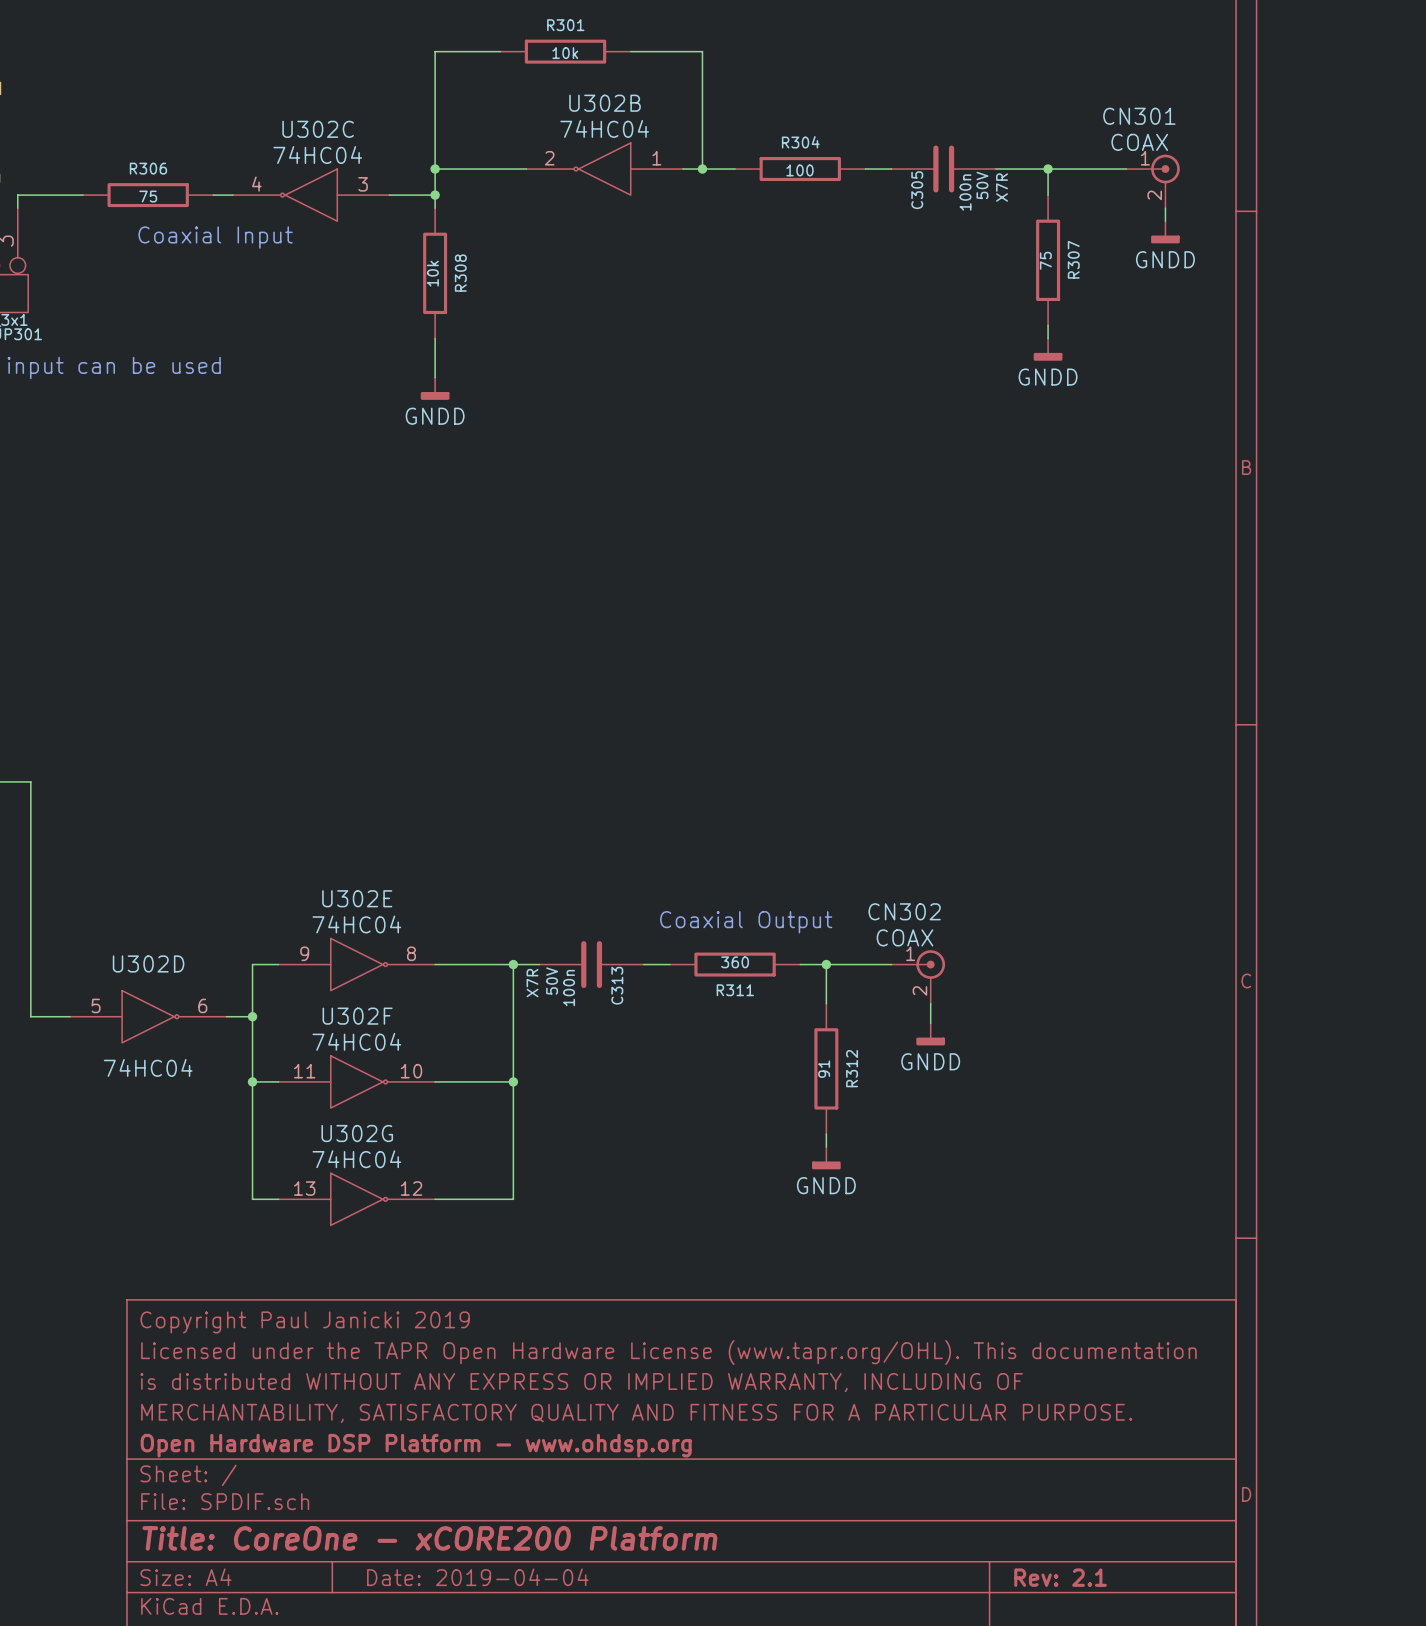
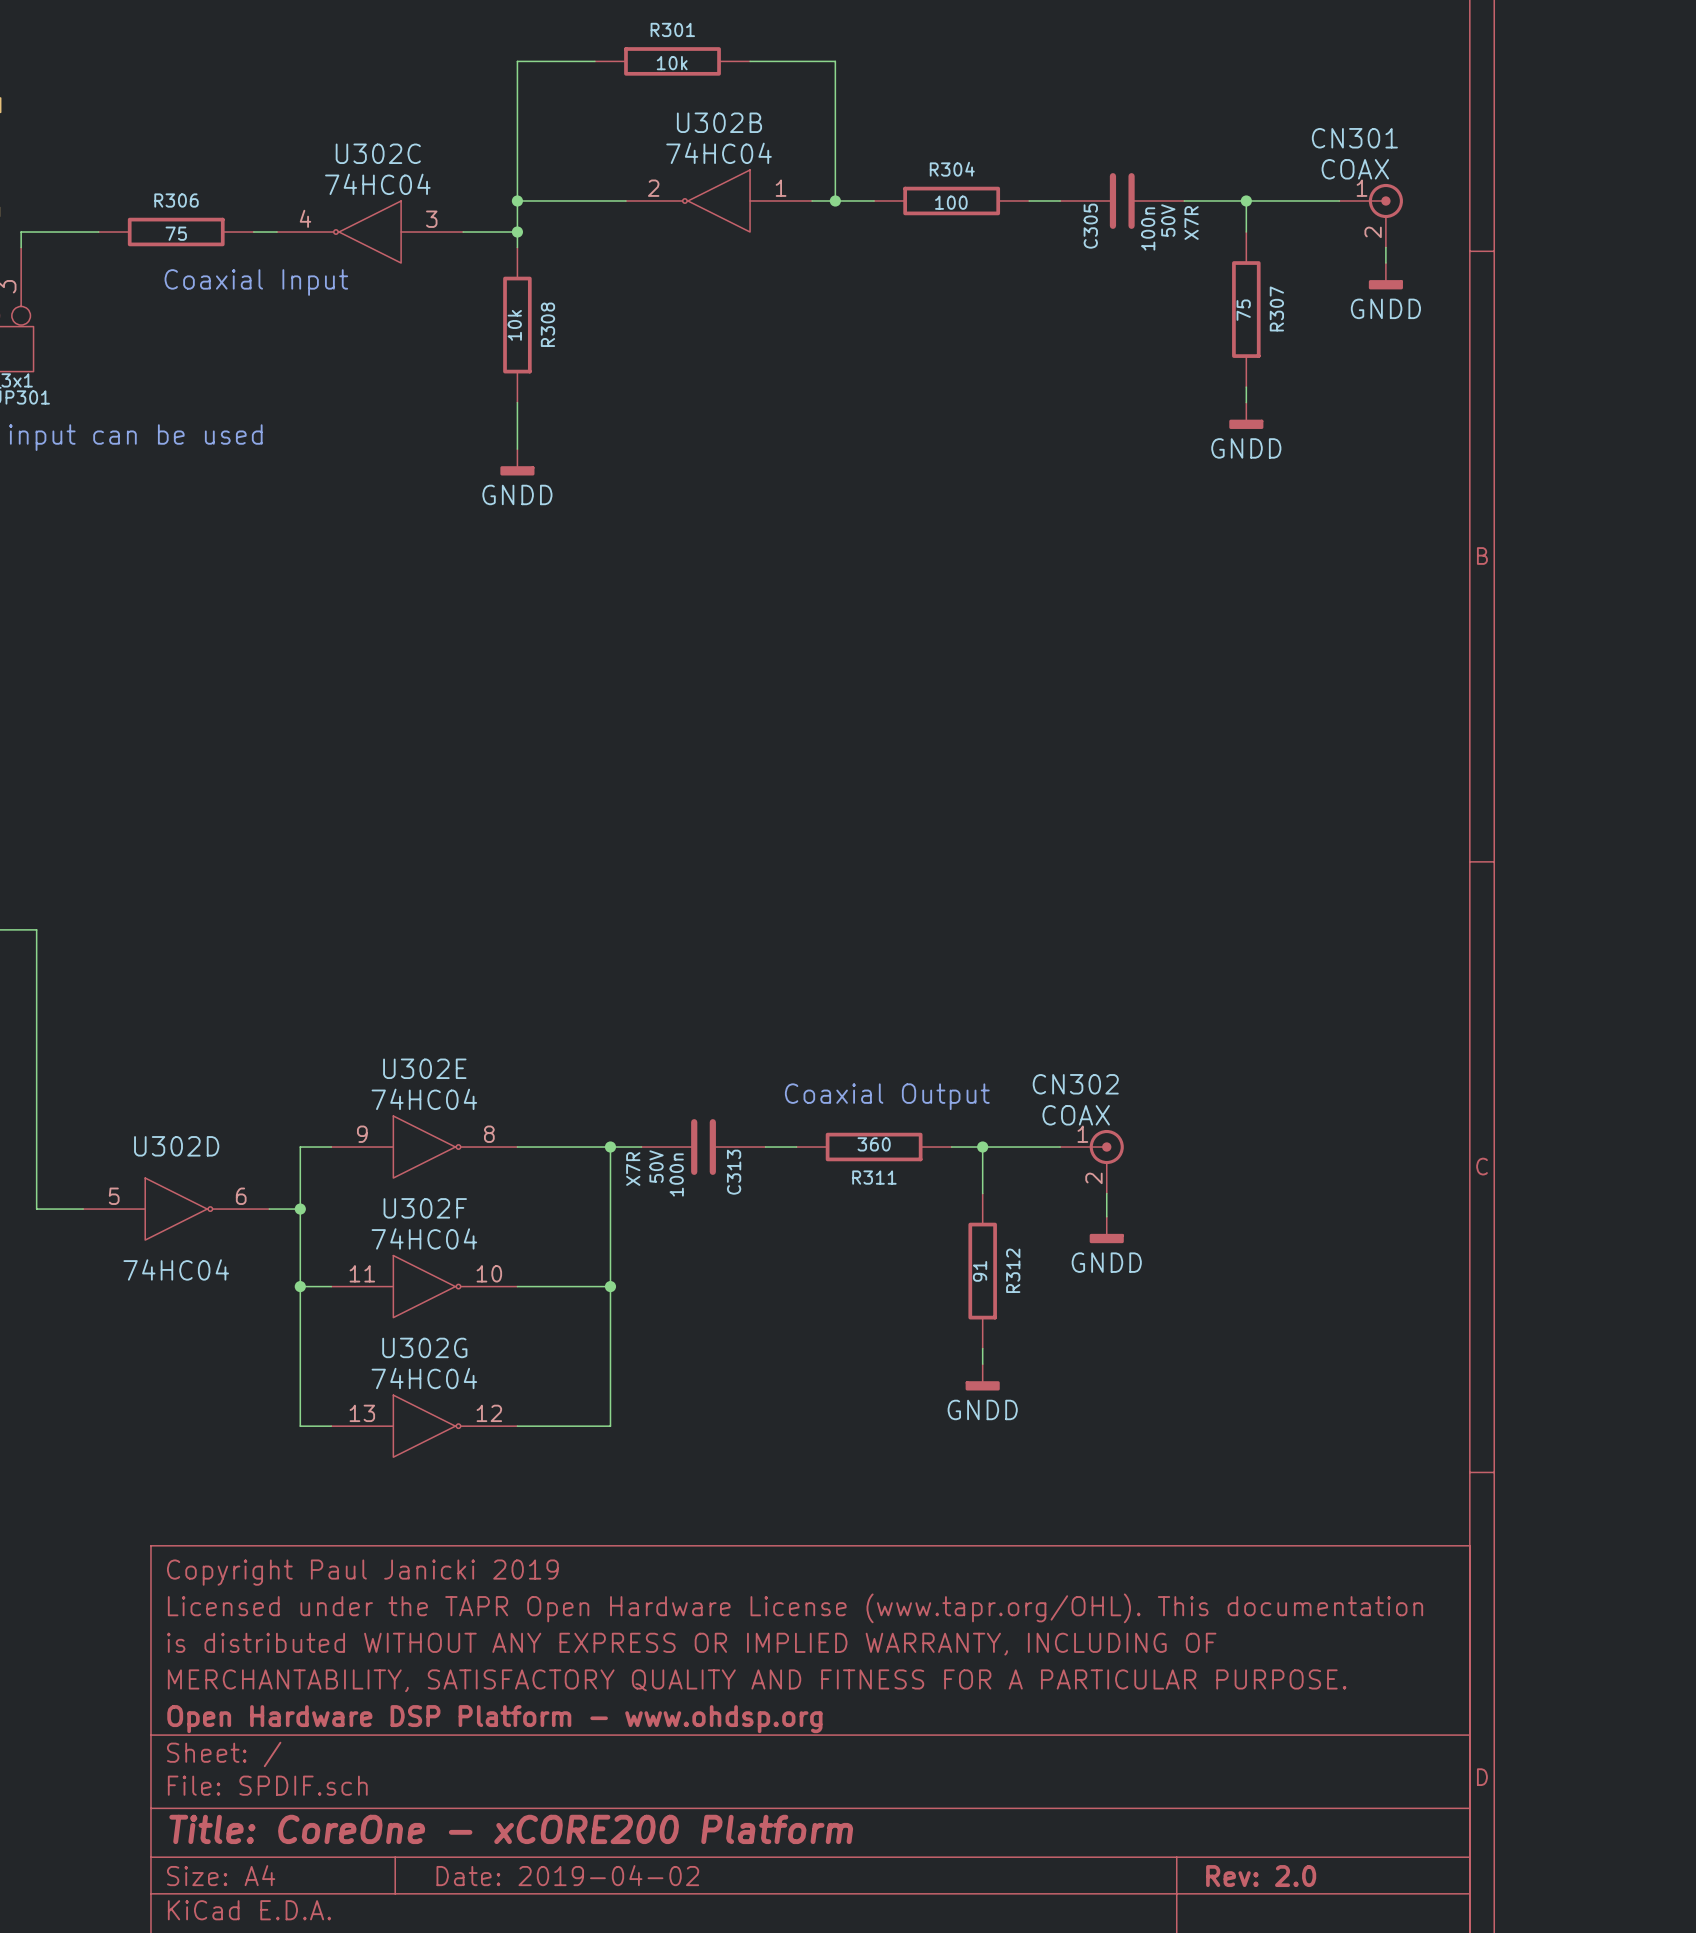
title block: Date: 2019-04-04 (477, 1577) -> Date: 2019-04-02 (567, 1875)
title block: Rev: 2.1 (1060, 1577) -> Rev: 2.0 (1261, 1876)

